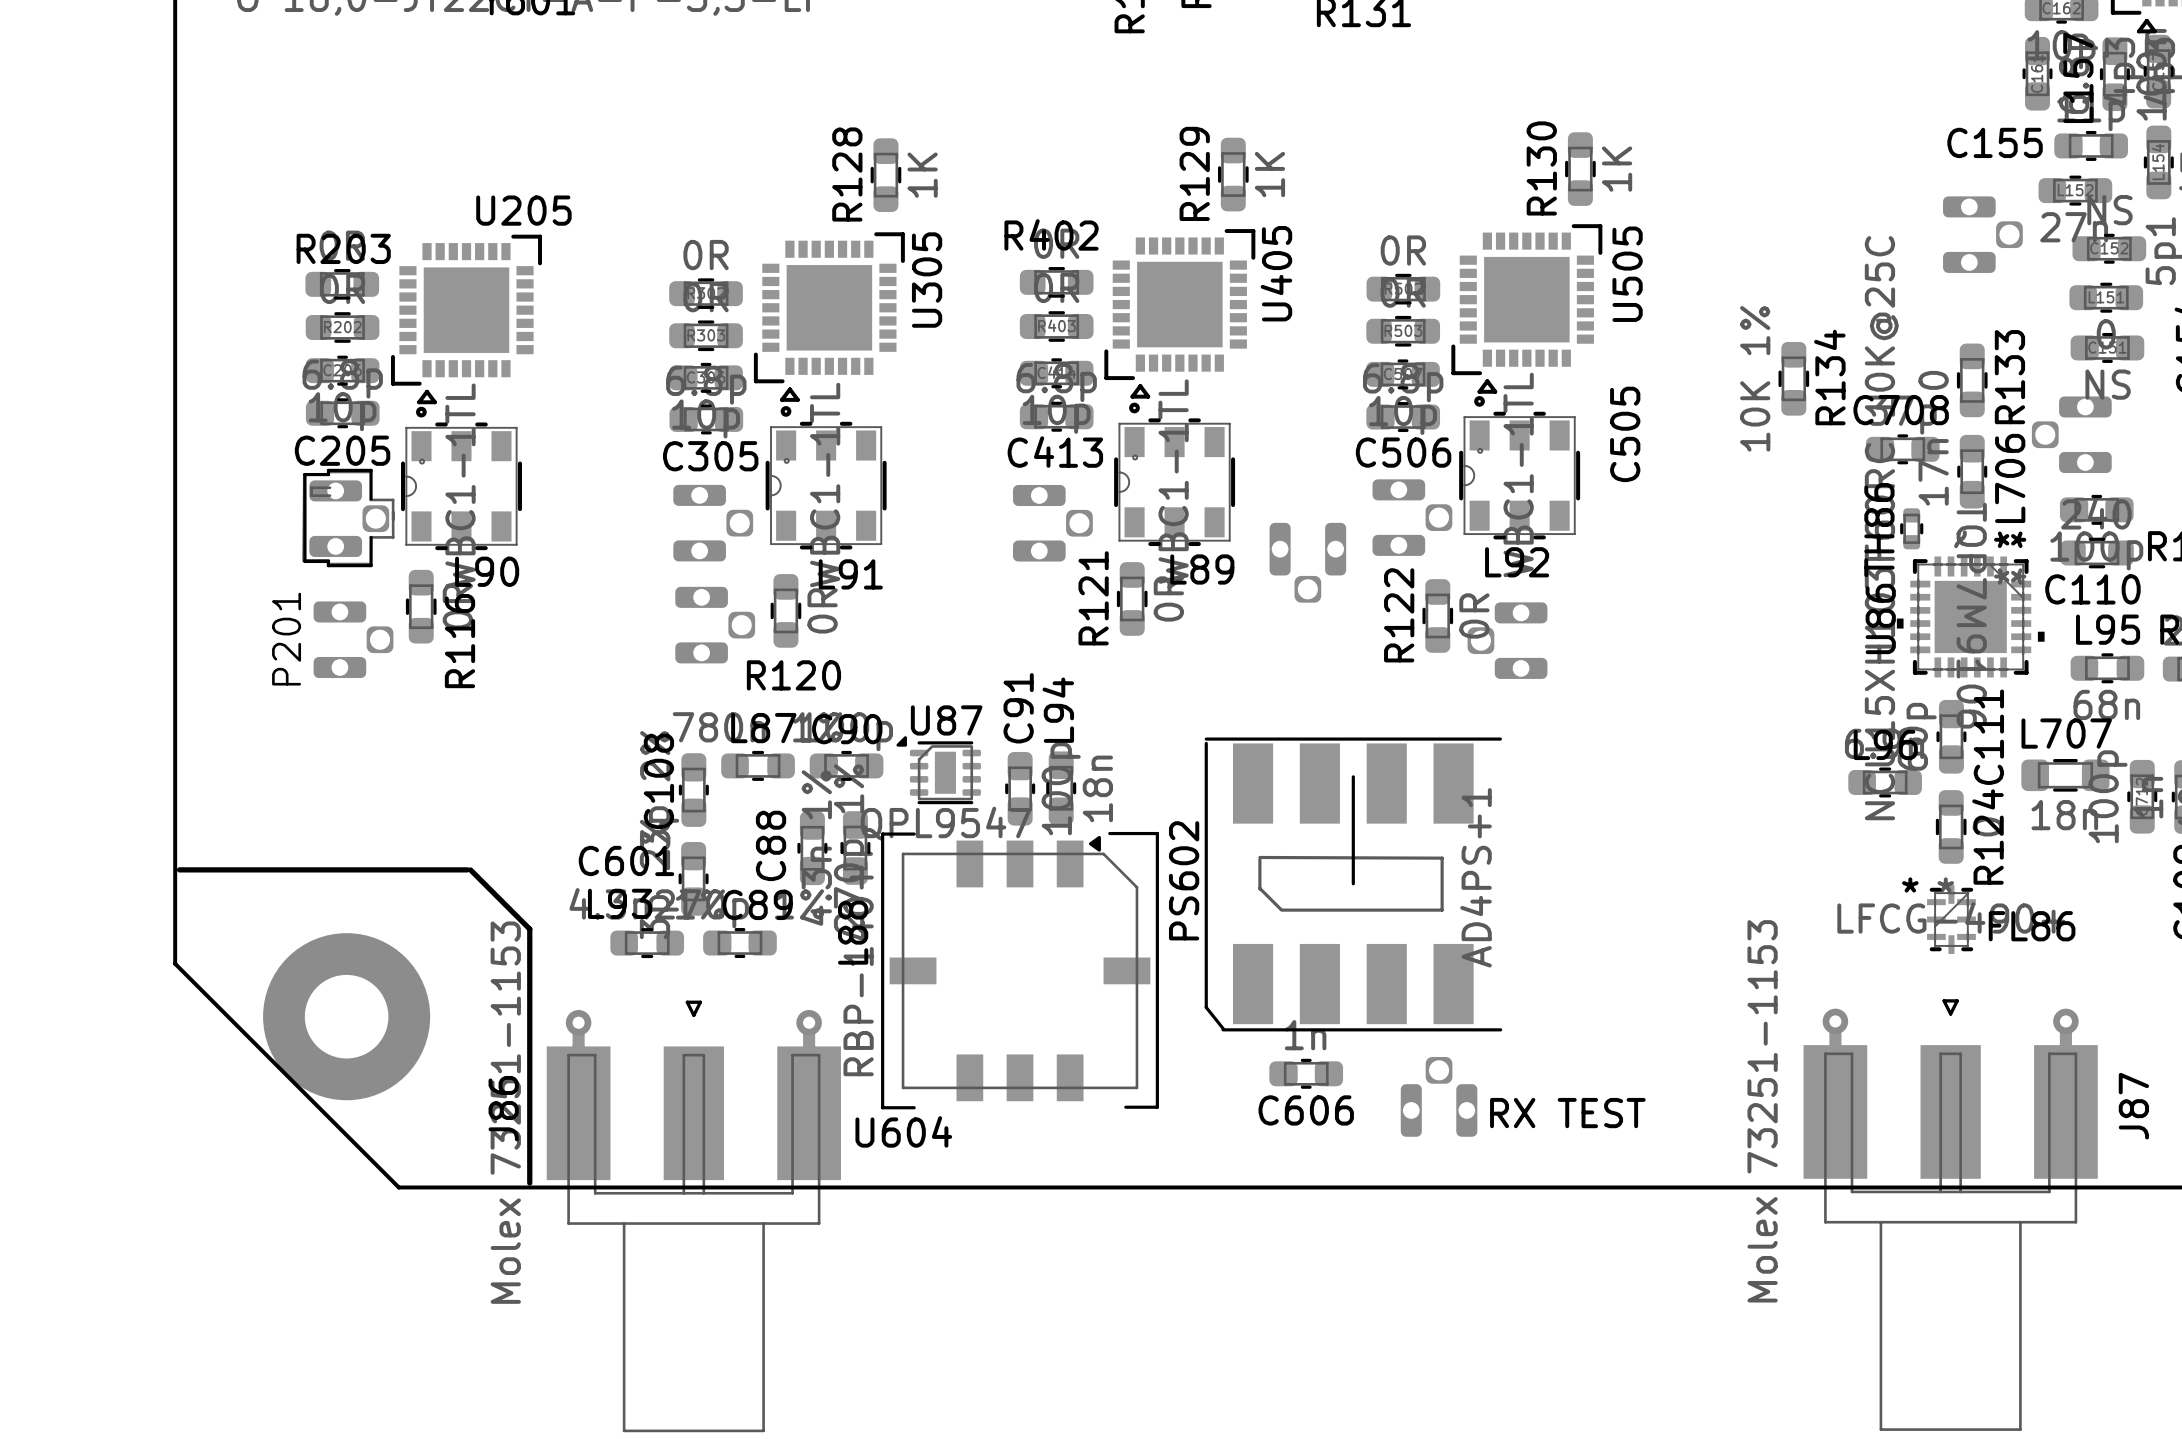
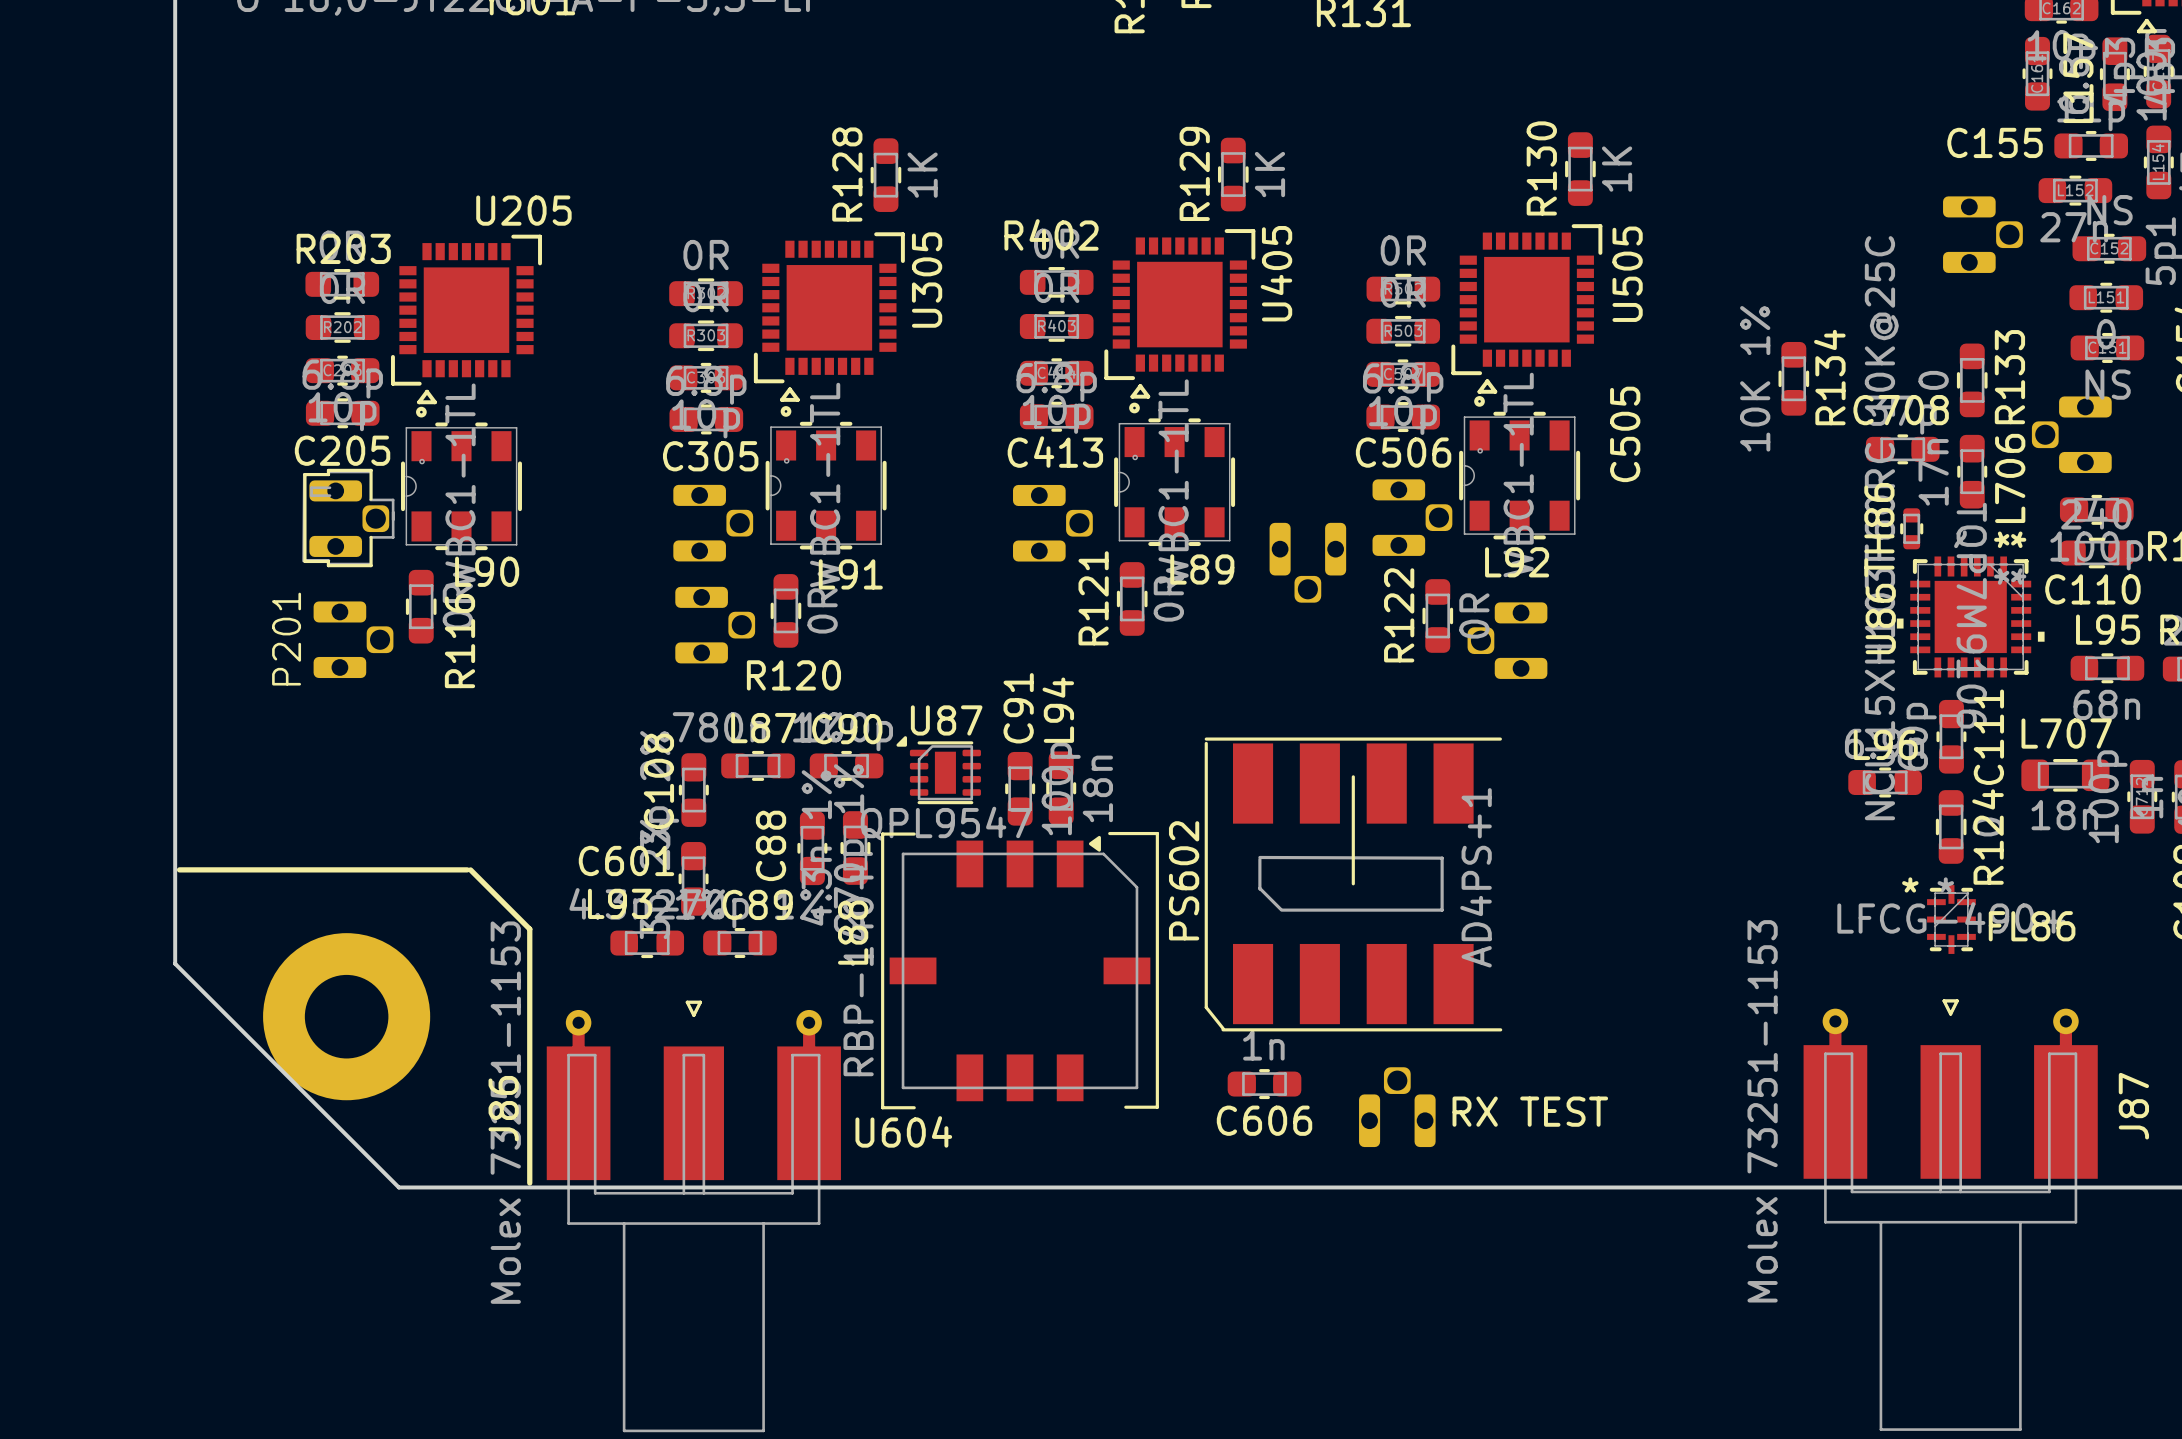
C606 position: (1306, 1073) -> (1264, 1084)
part position: (1439, 1096) -> (1397, 1107)
text position: RX TEST (1567, 1113) -> RX TEST (1530, 1111)

